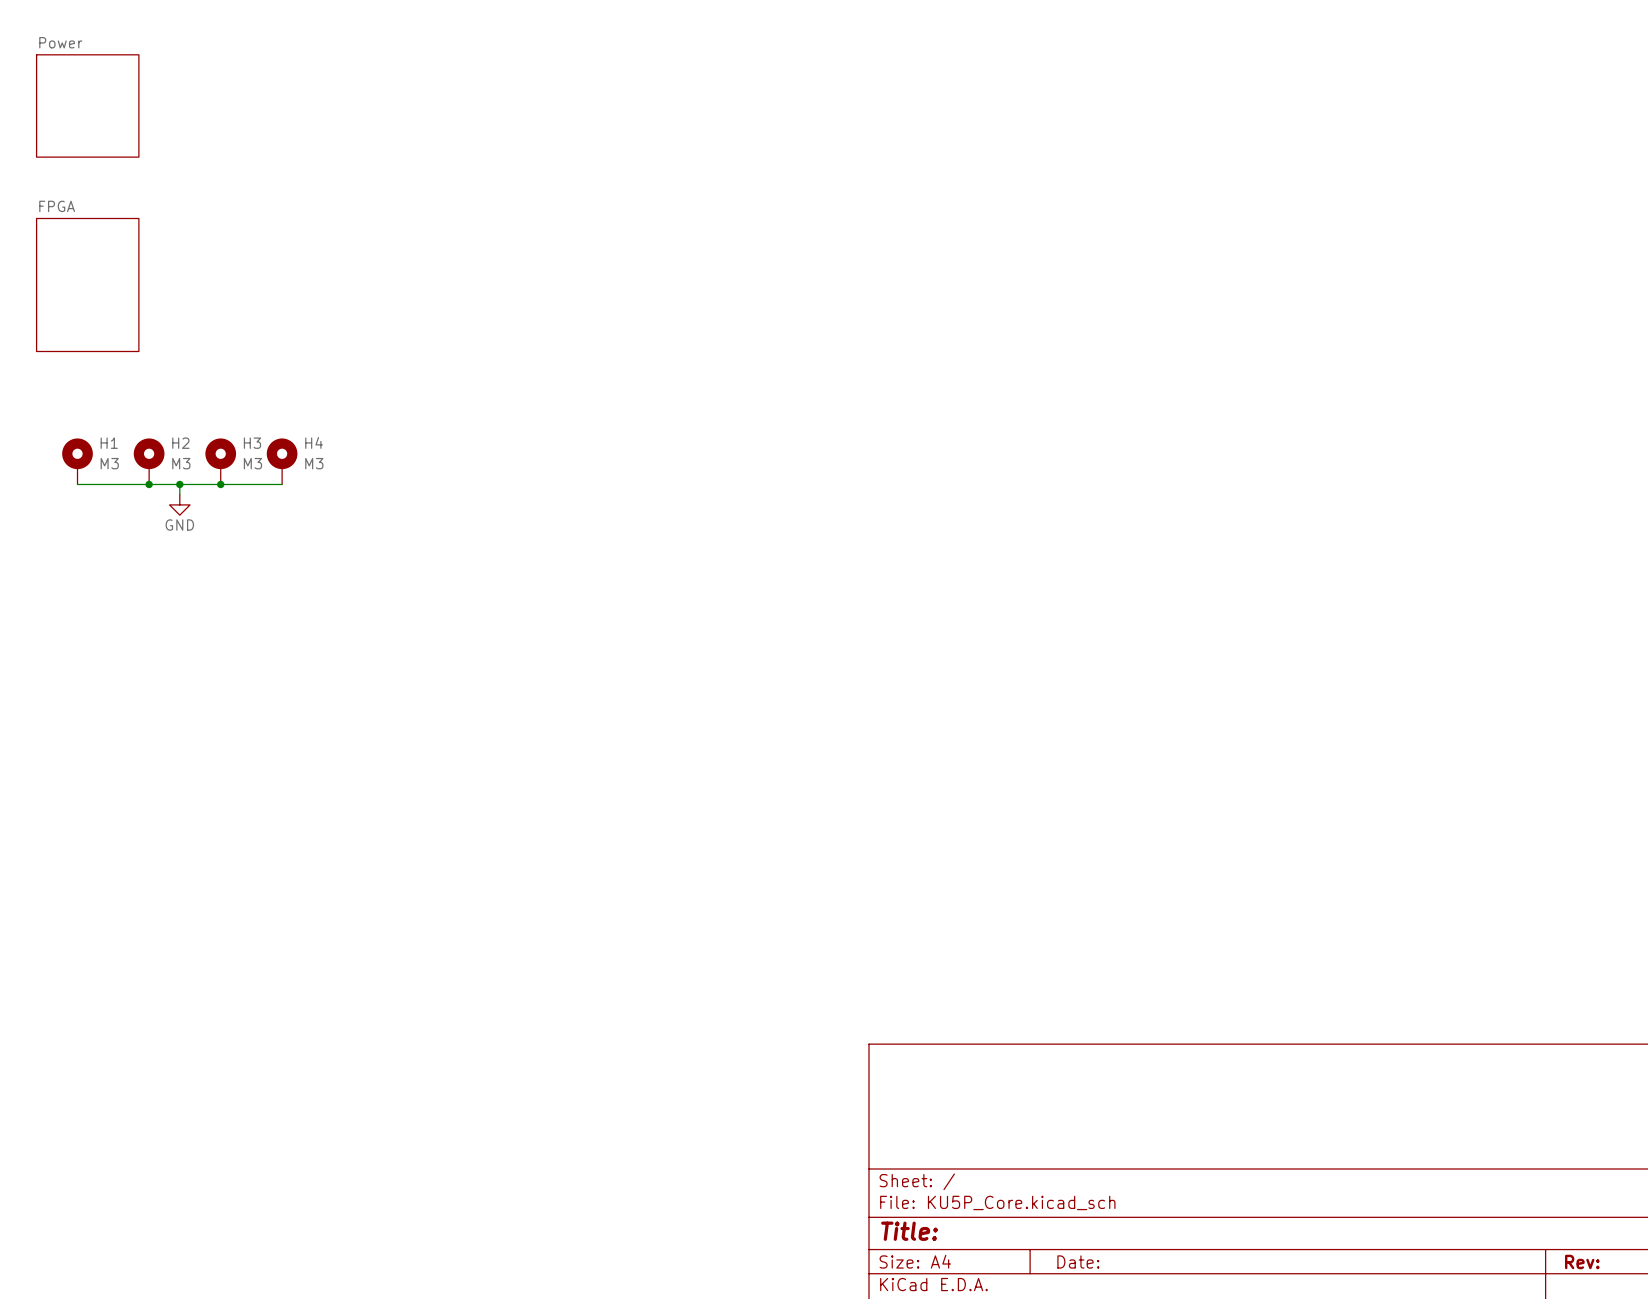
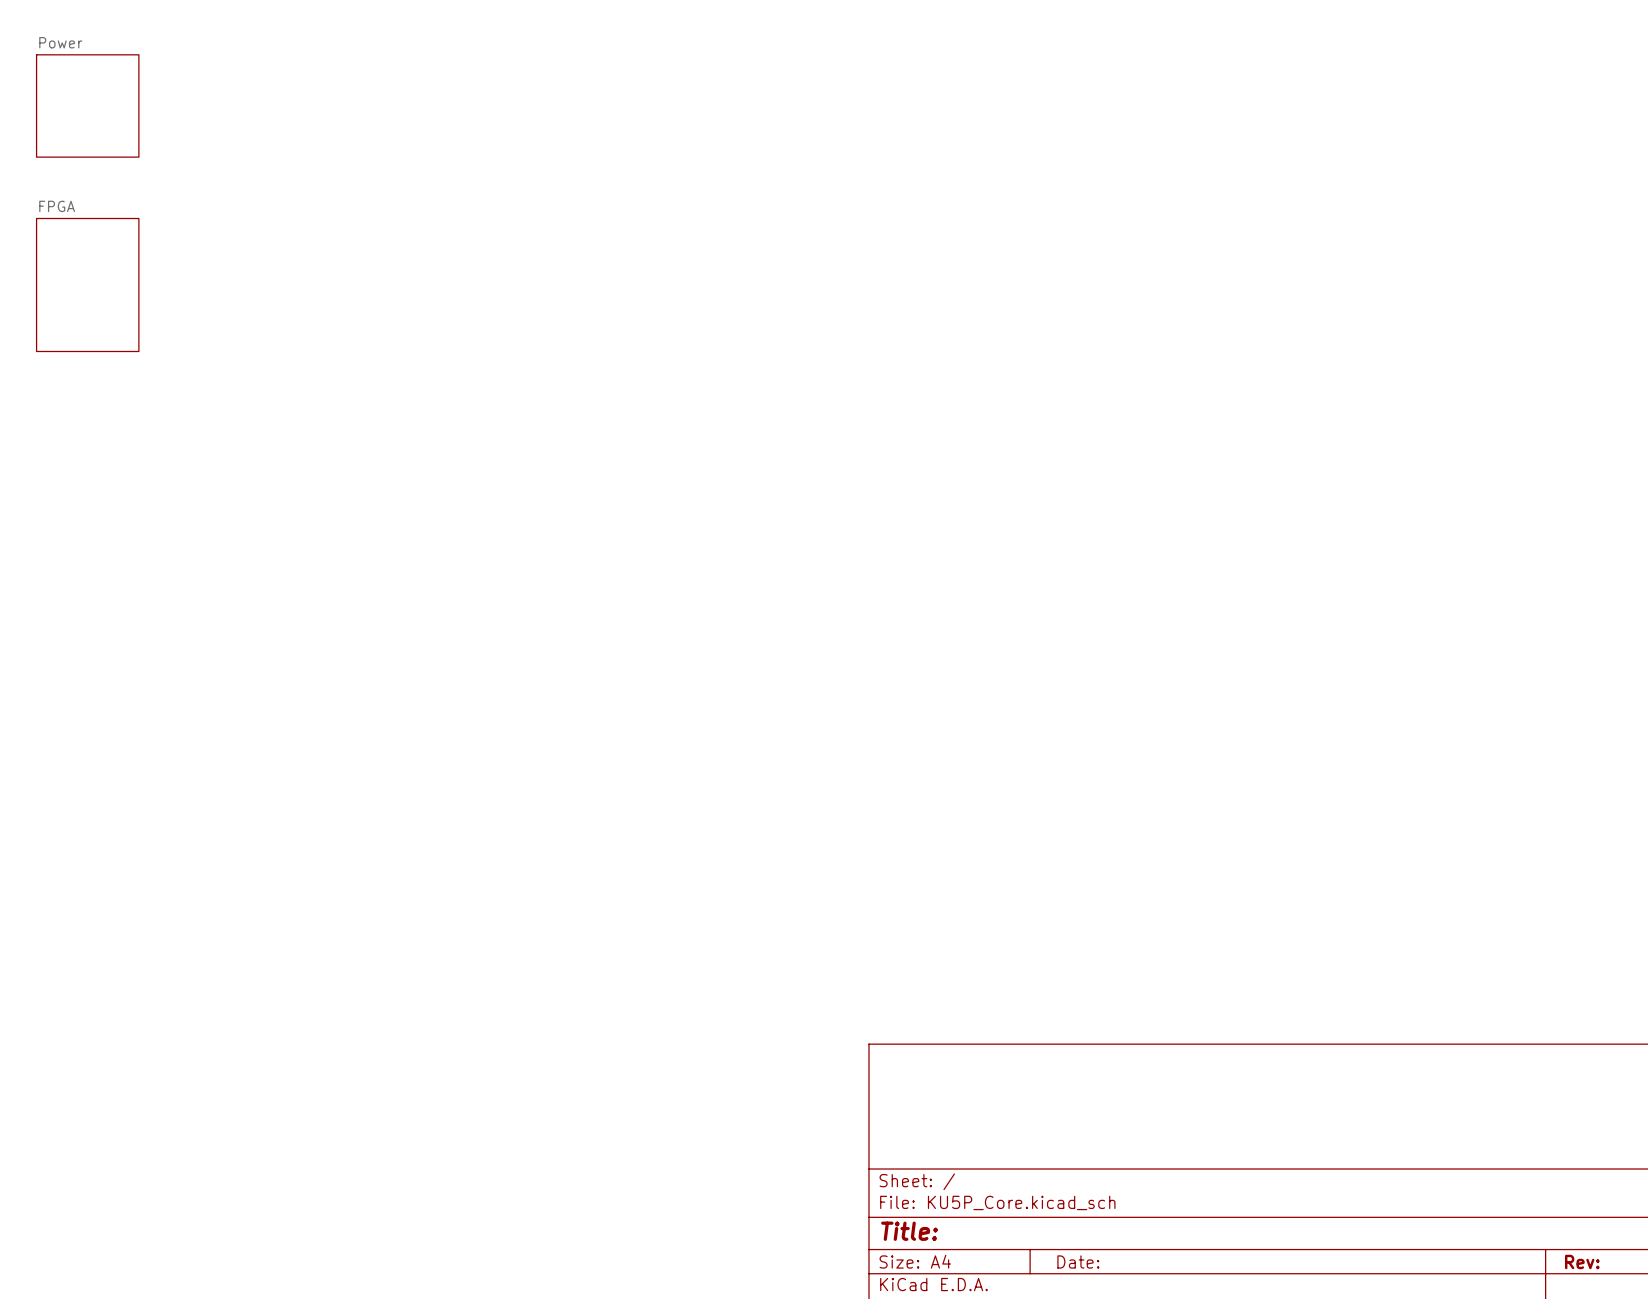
H1: M3 (77, 461) -> none
H2: M3 (149, 461) -> none
H3: M3 (220, 461) -> none
H4: M3 (282, 461) -> none
wire: (77, 484) (282, 484) -> none
junction: (149, 484) -> none
wire: (179, 484) (179, 494) -> none
junction: (179, 484) -> none
junction: (220, 484) -> none
power symbol: GND (179, 504) -> none

